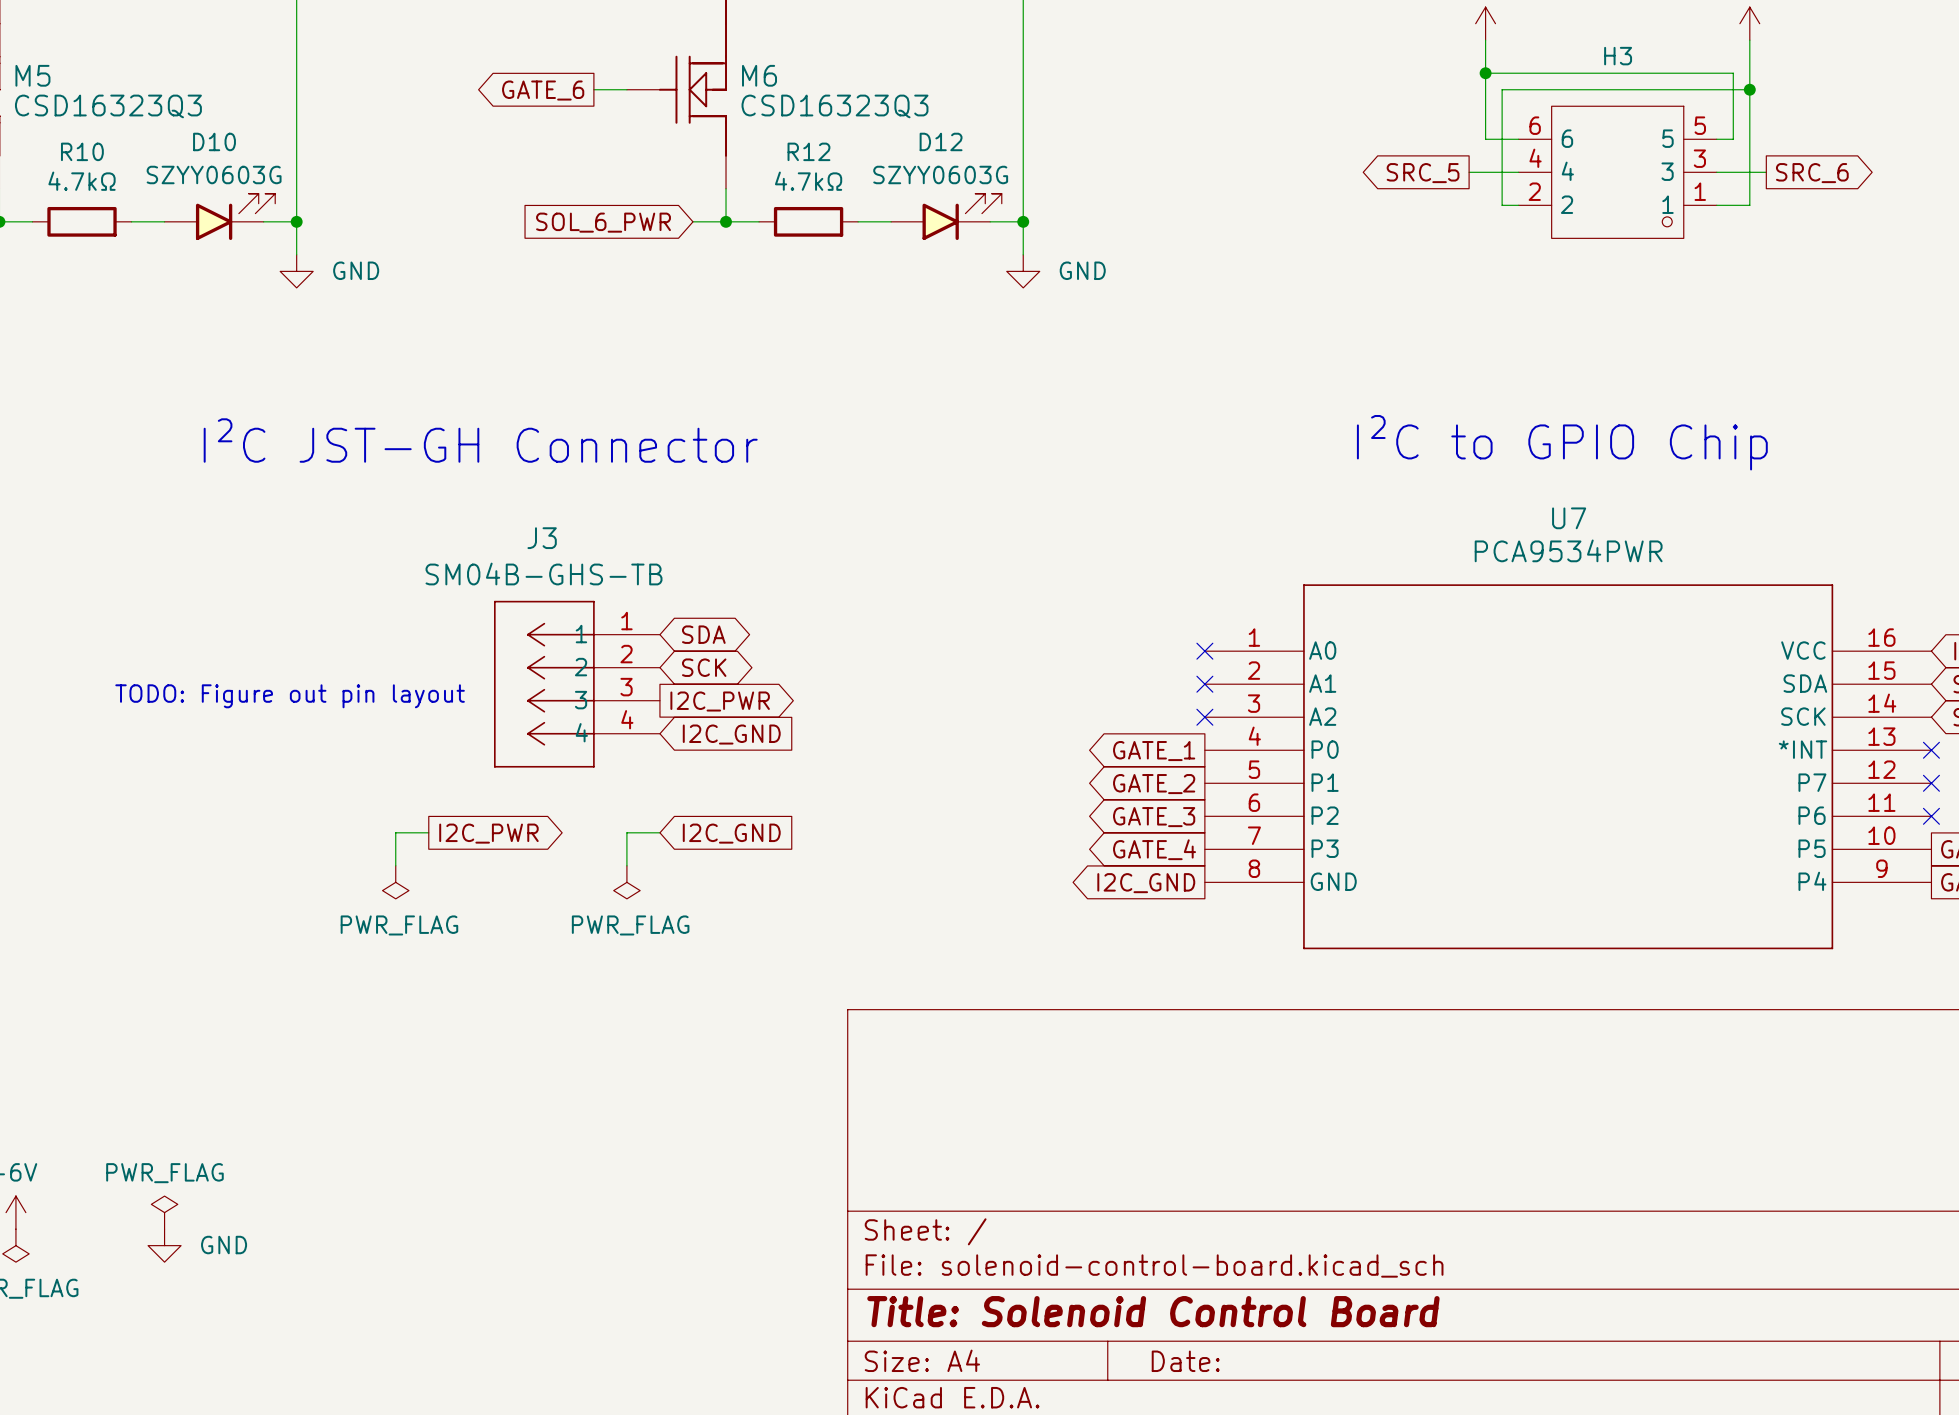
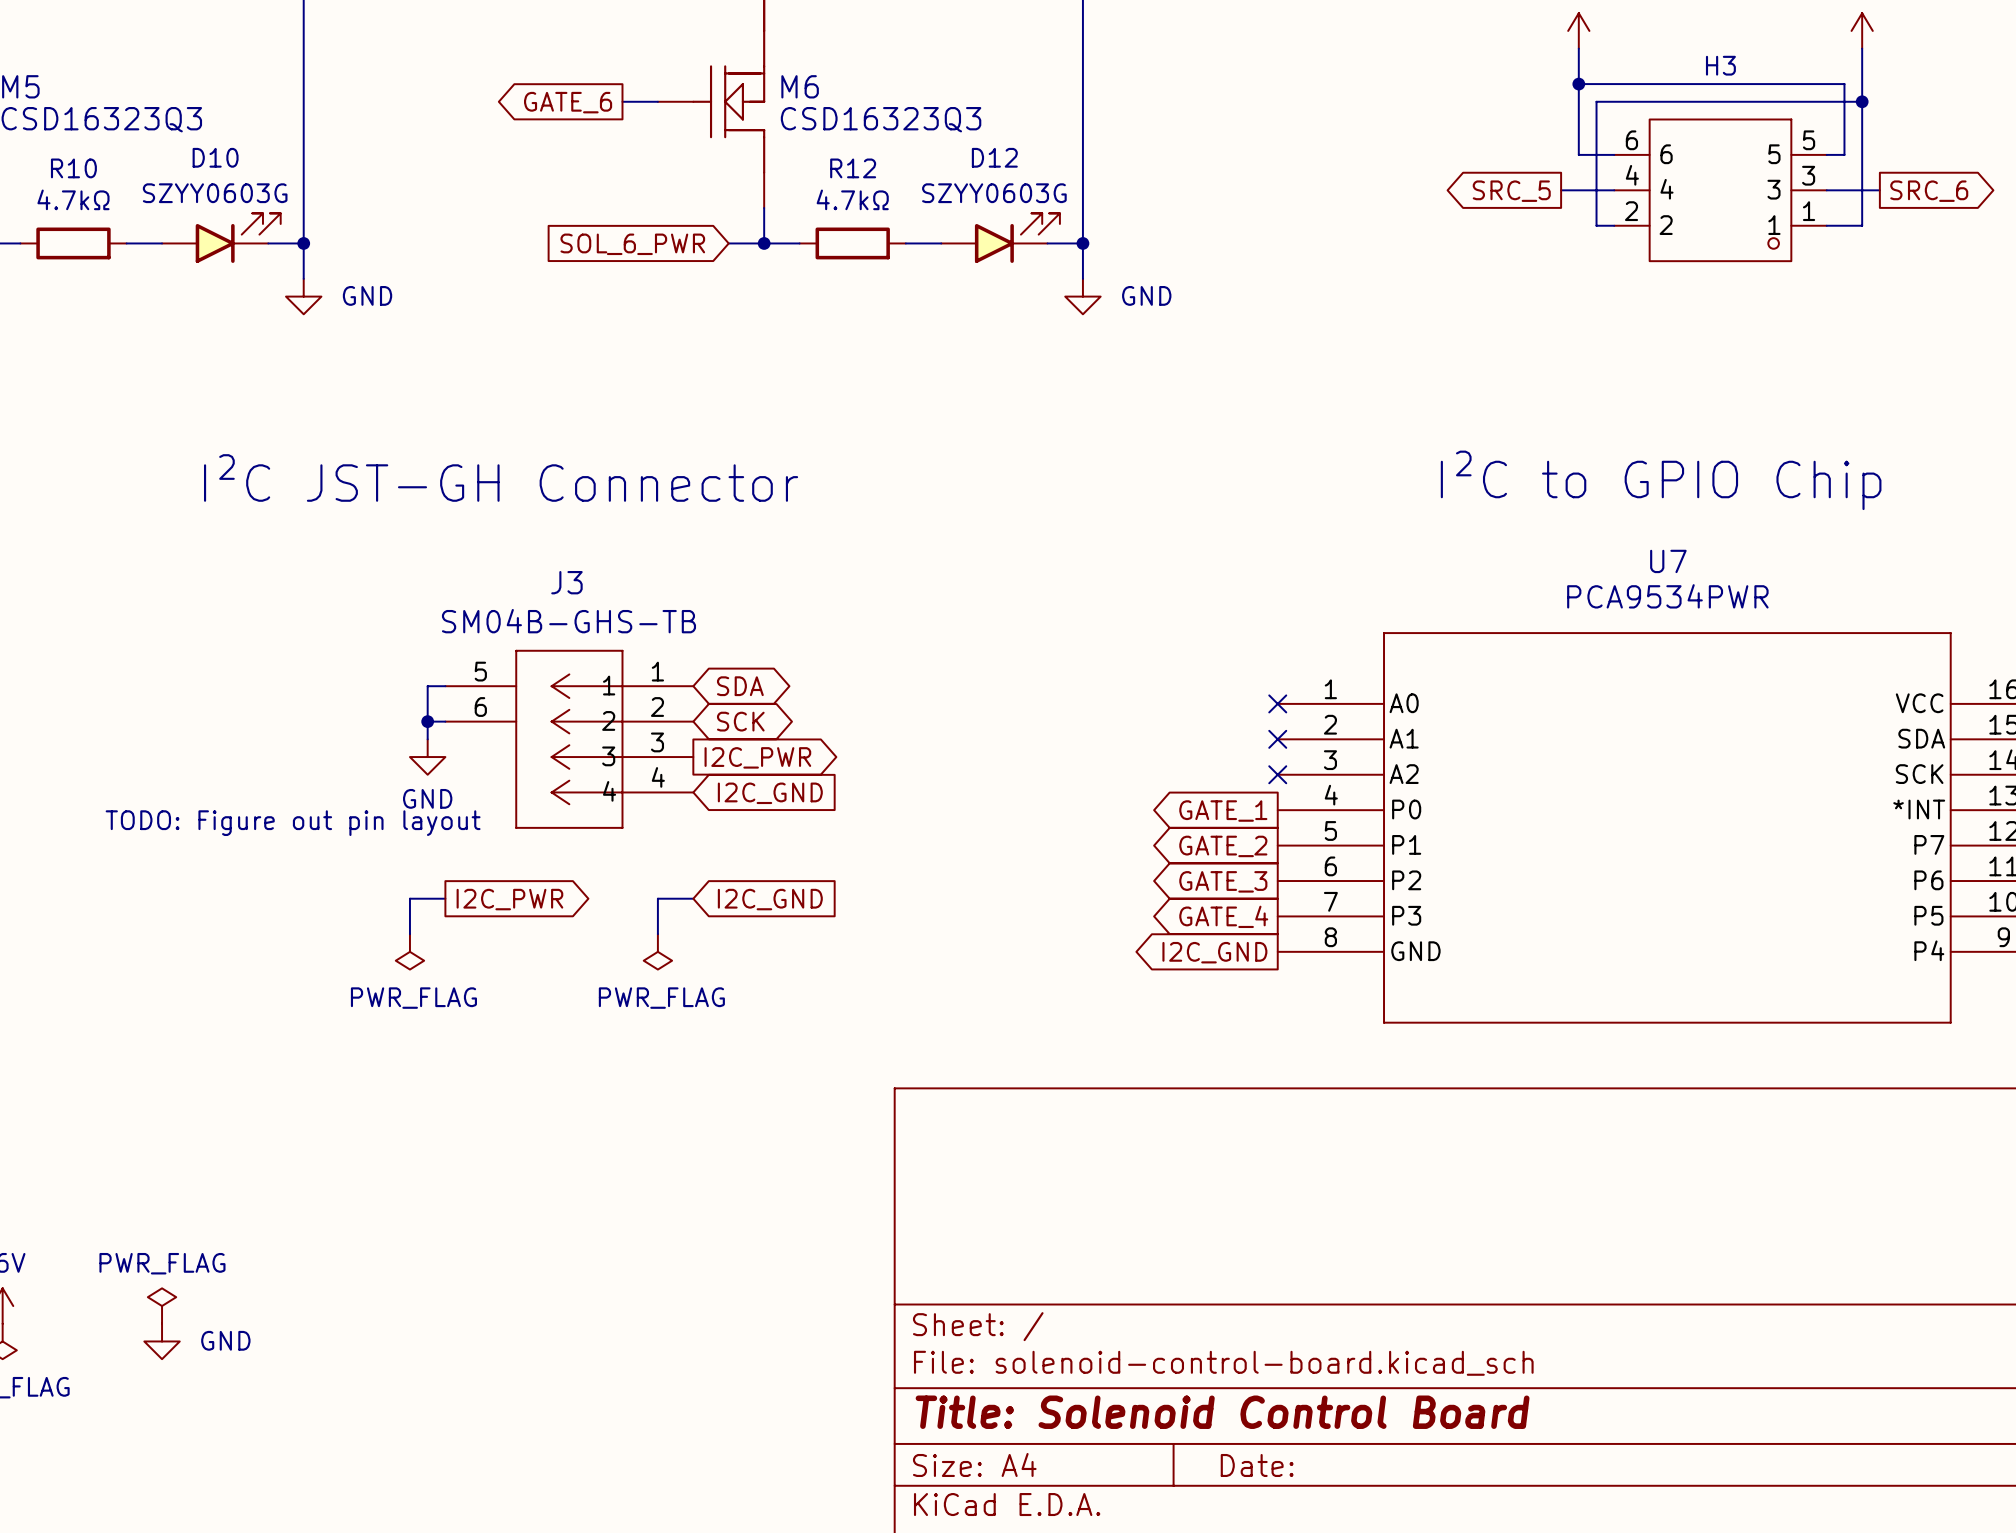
J3 symbol: [494, 600, 660, 768] -> [445, 649, 694, 829]
wire: none -> (445, 686) (427, 686) (427, 739)
wire: none -> (427, 721) (445, 721)
junction: none -> (427, 721)
text position: TODO: Figure out pin layout (290, 696) -> TODO: Figure out pin layout (293, 823)
power symbol: none -> GND (427, 757)

